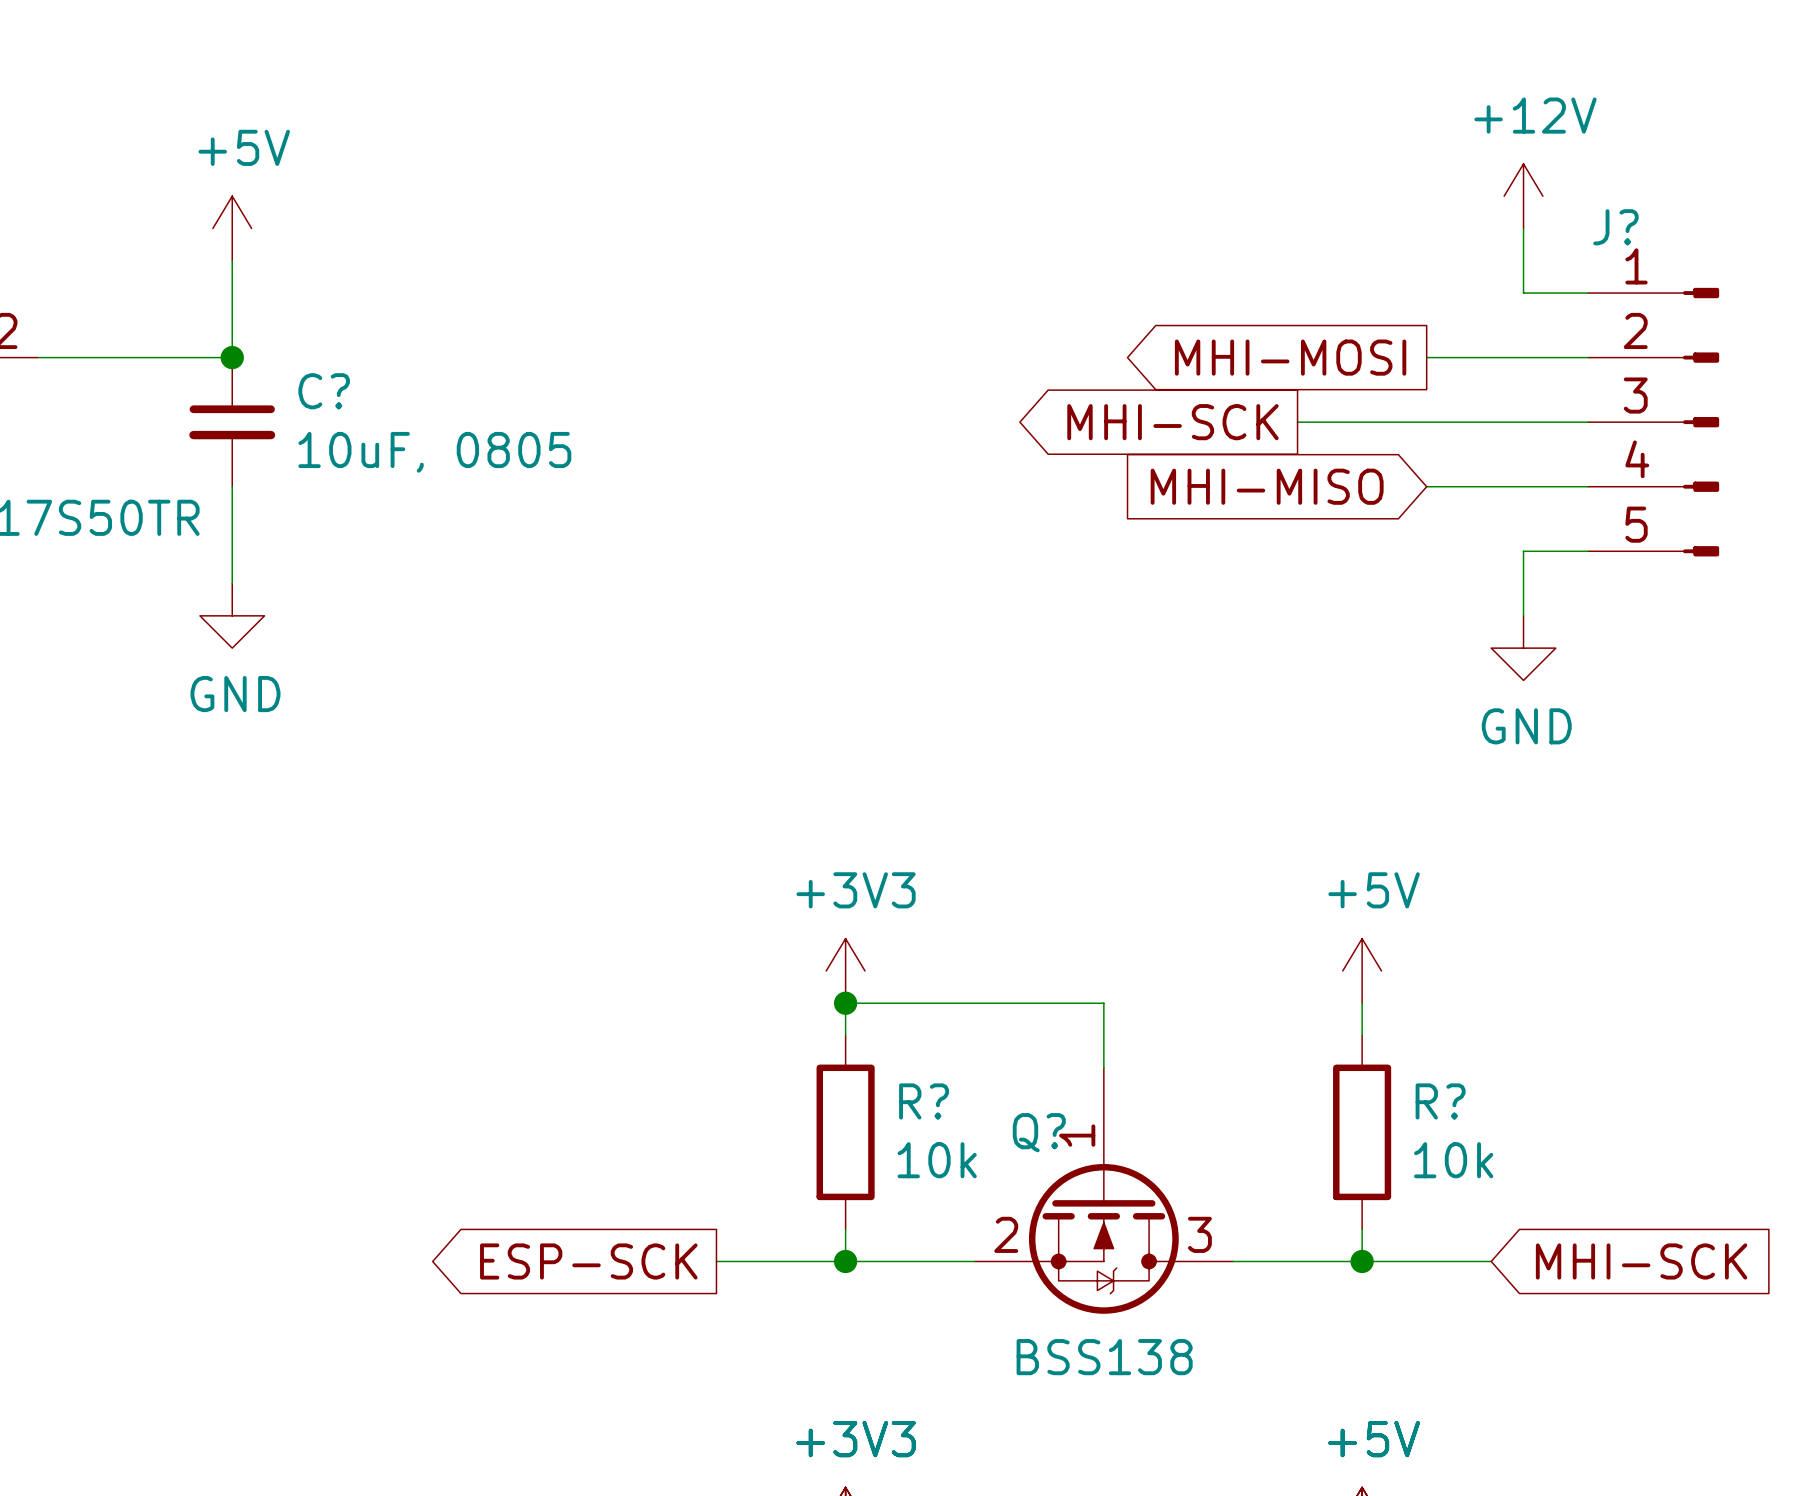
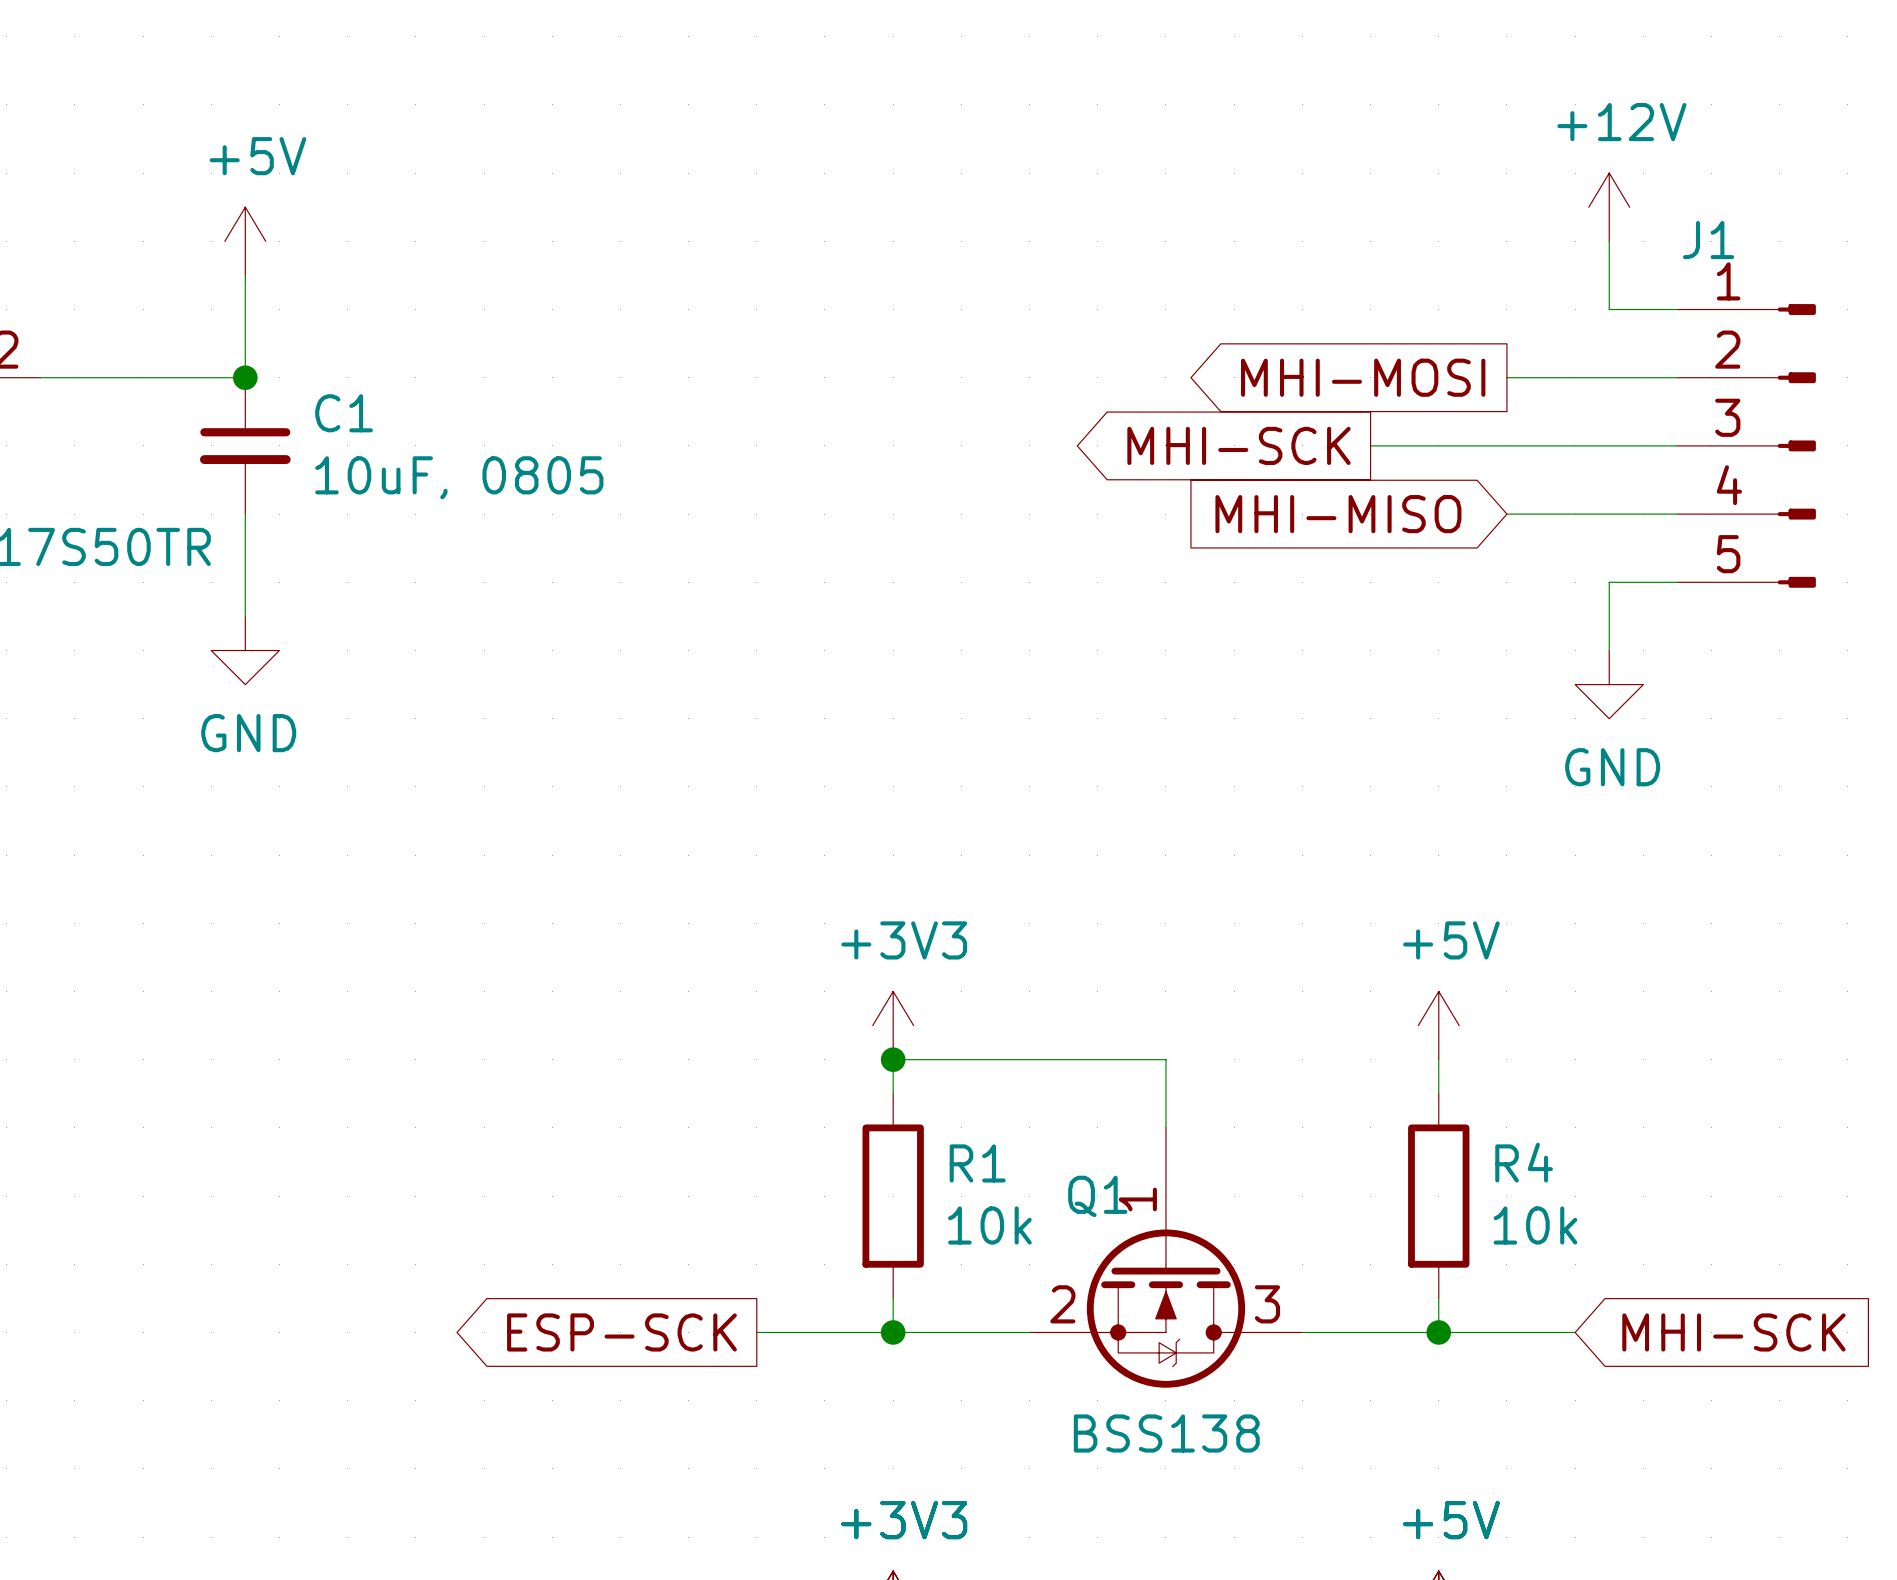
J? name: J? (1616, 227) -> J1 (1708, 240)
C? name: C? (324, 391) -> C1 (344, 413)
R? name: R? (924, 1101) -> R1 (977, 1163)
R? name: R? (1440, 1101) -> R4 (1524, 1162)
Q? name: Q? (1039, 1132) -> Q1 (1097, 1196)

